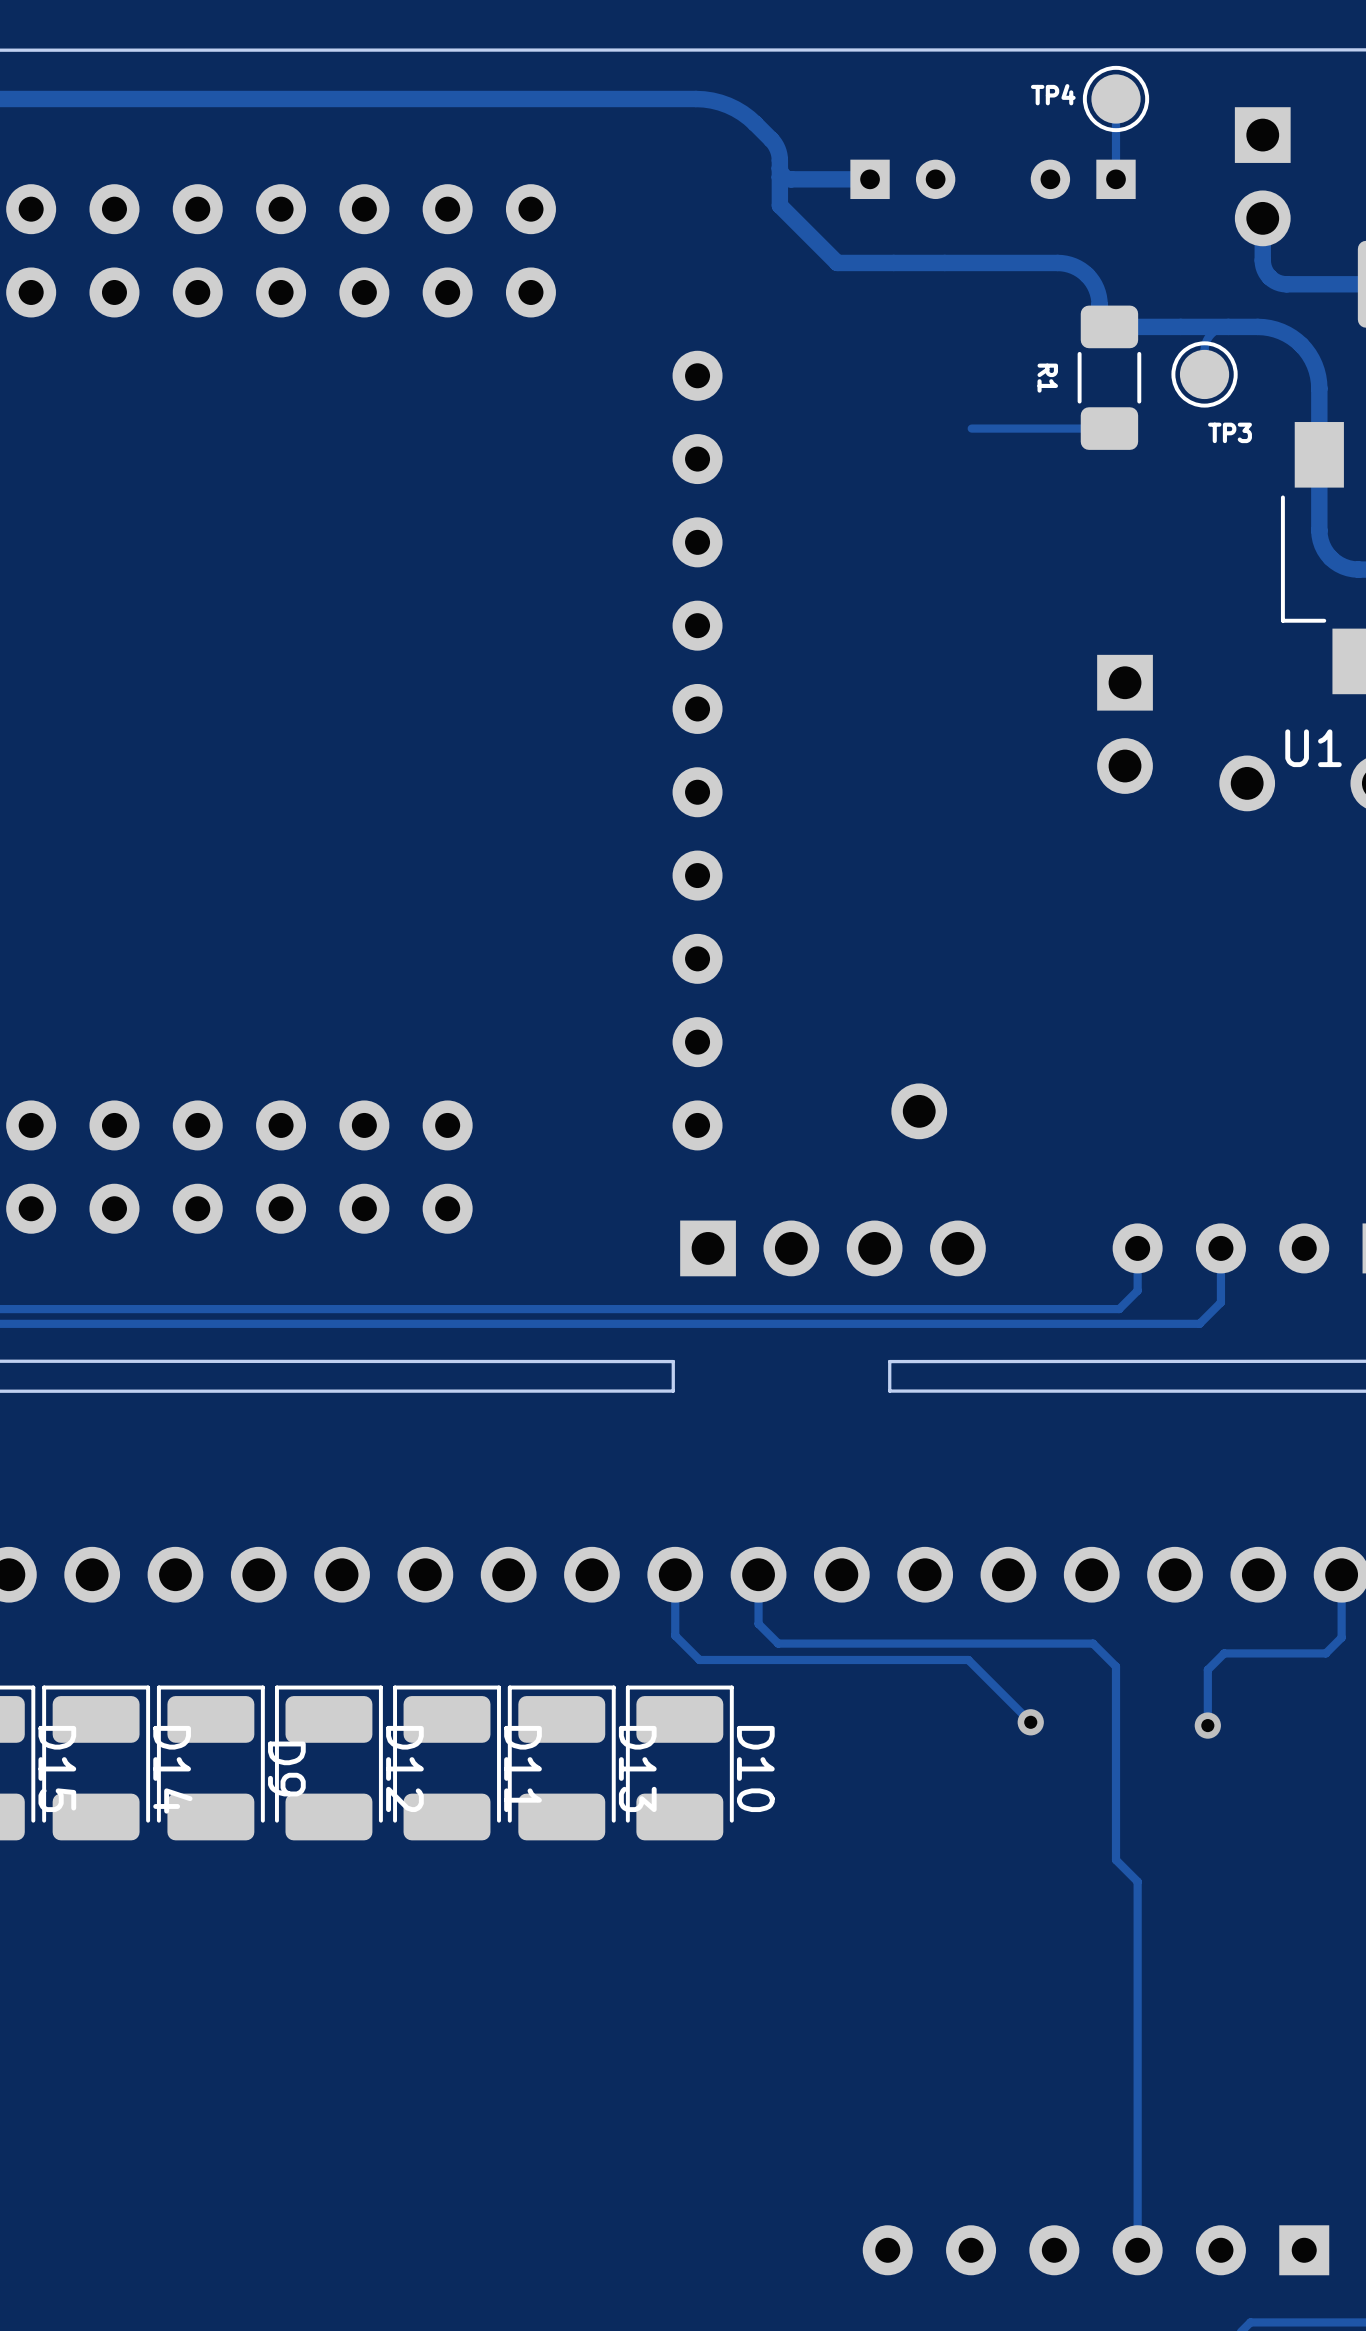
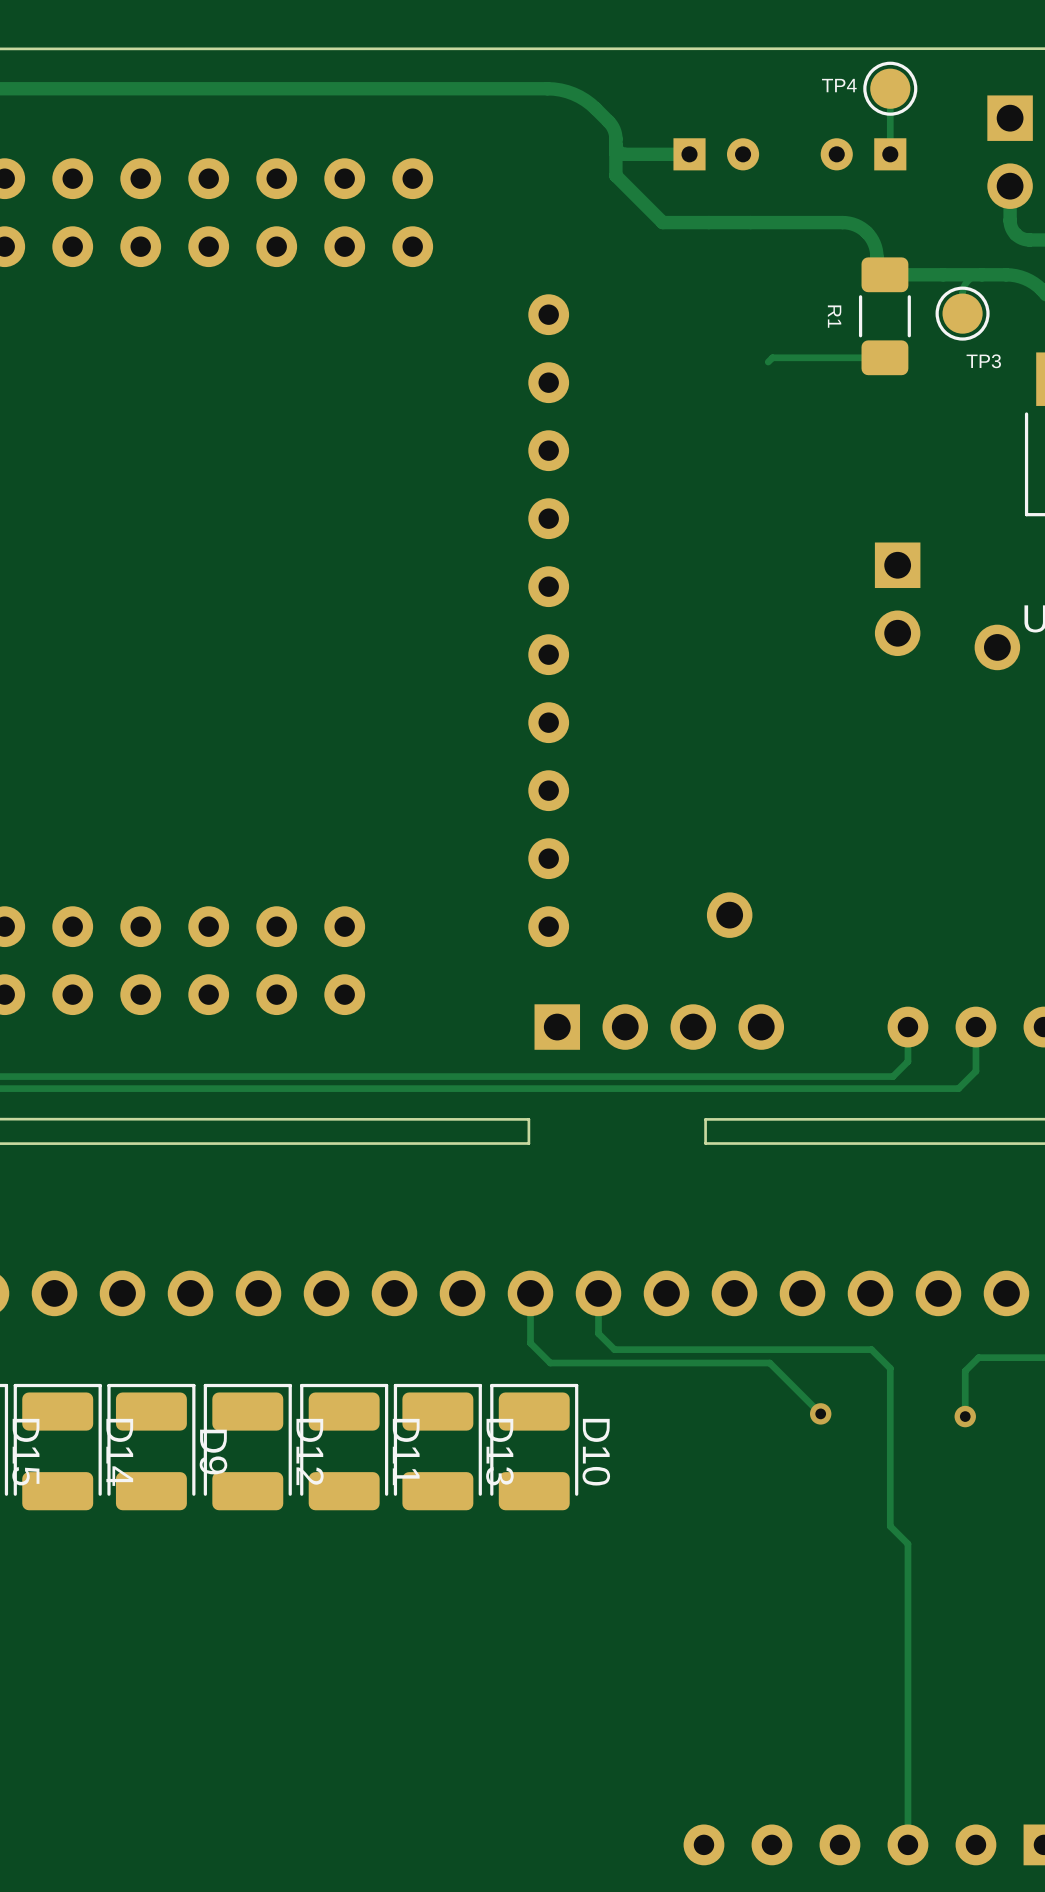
track: none -> (772, 357) (768, 362)

